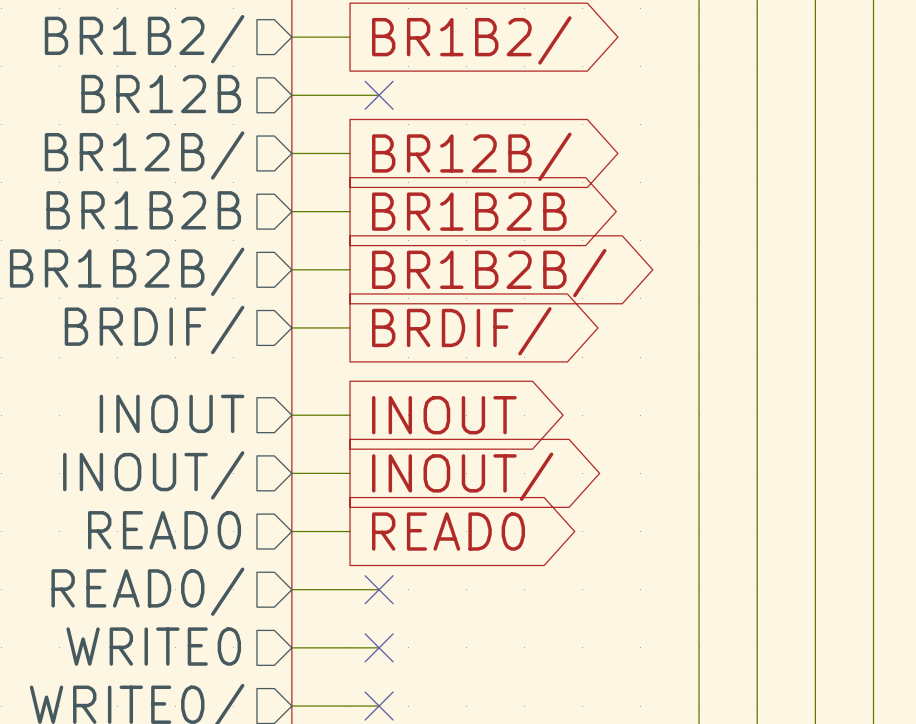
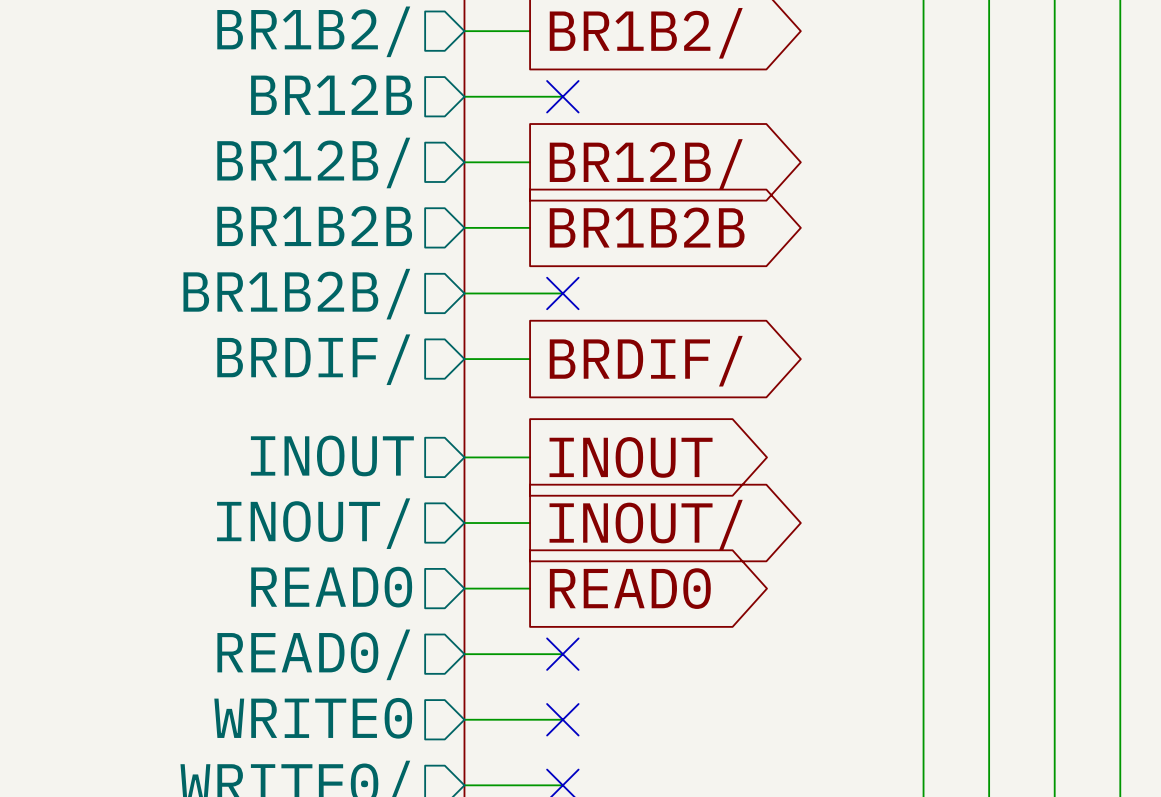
wire: none -> (530, 293) (562, 293)
no-connect mark: none -> (562, 293)
global label: BR1B2B/ (489, 273) -> none

